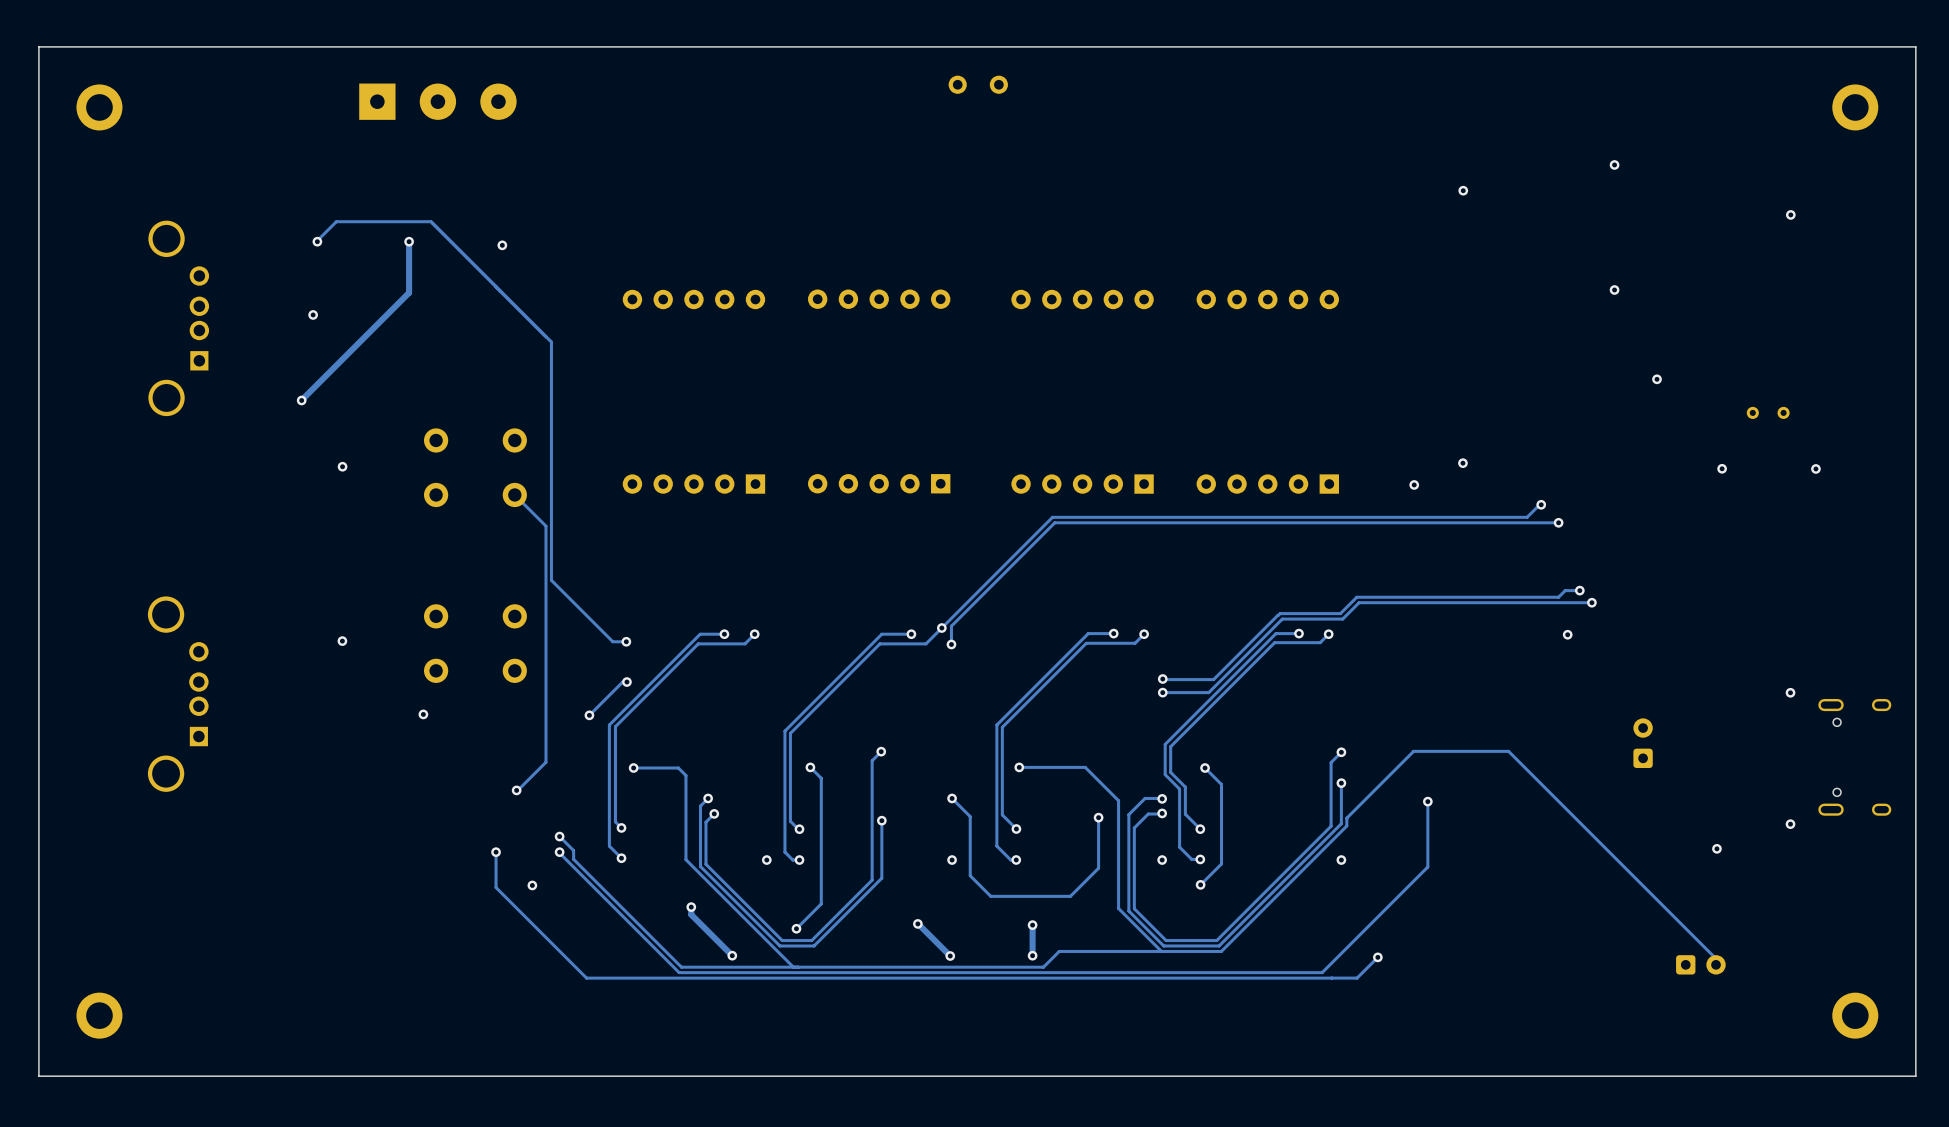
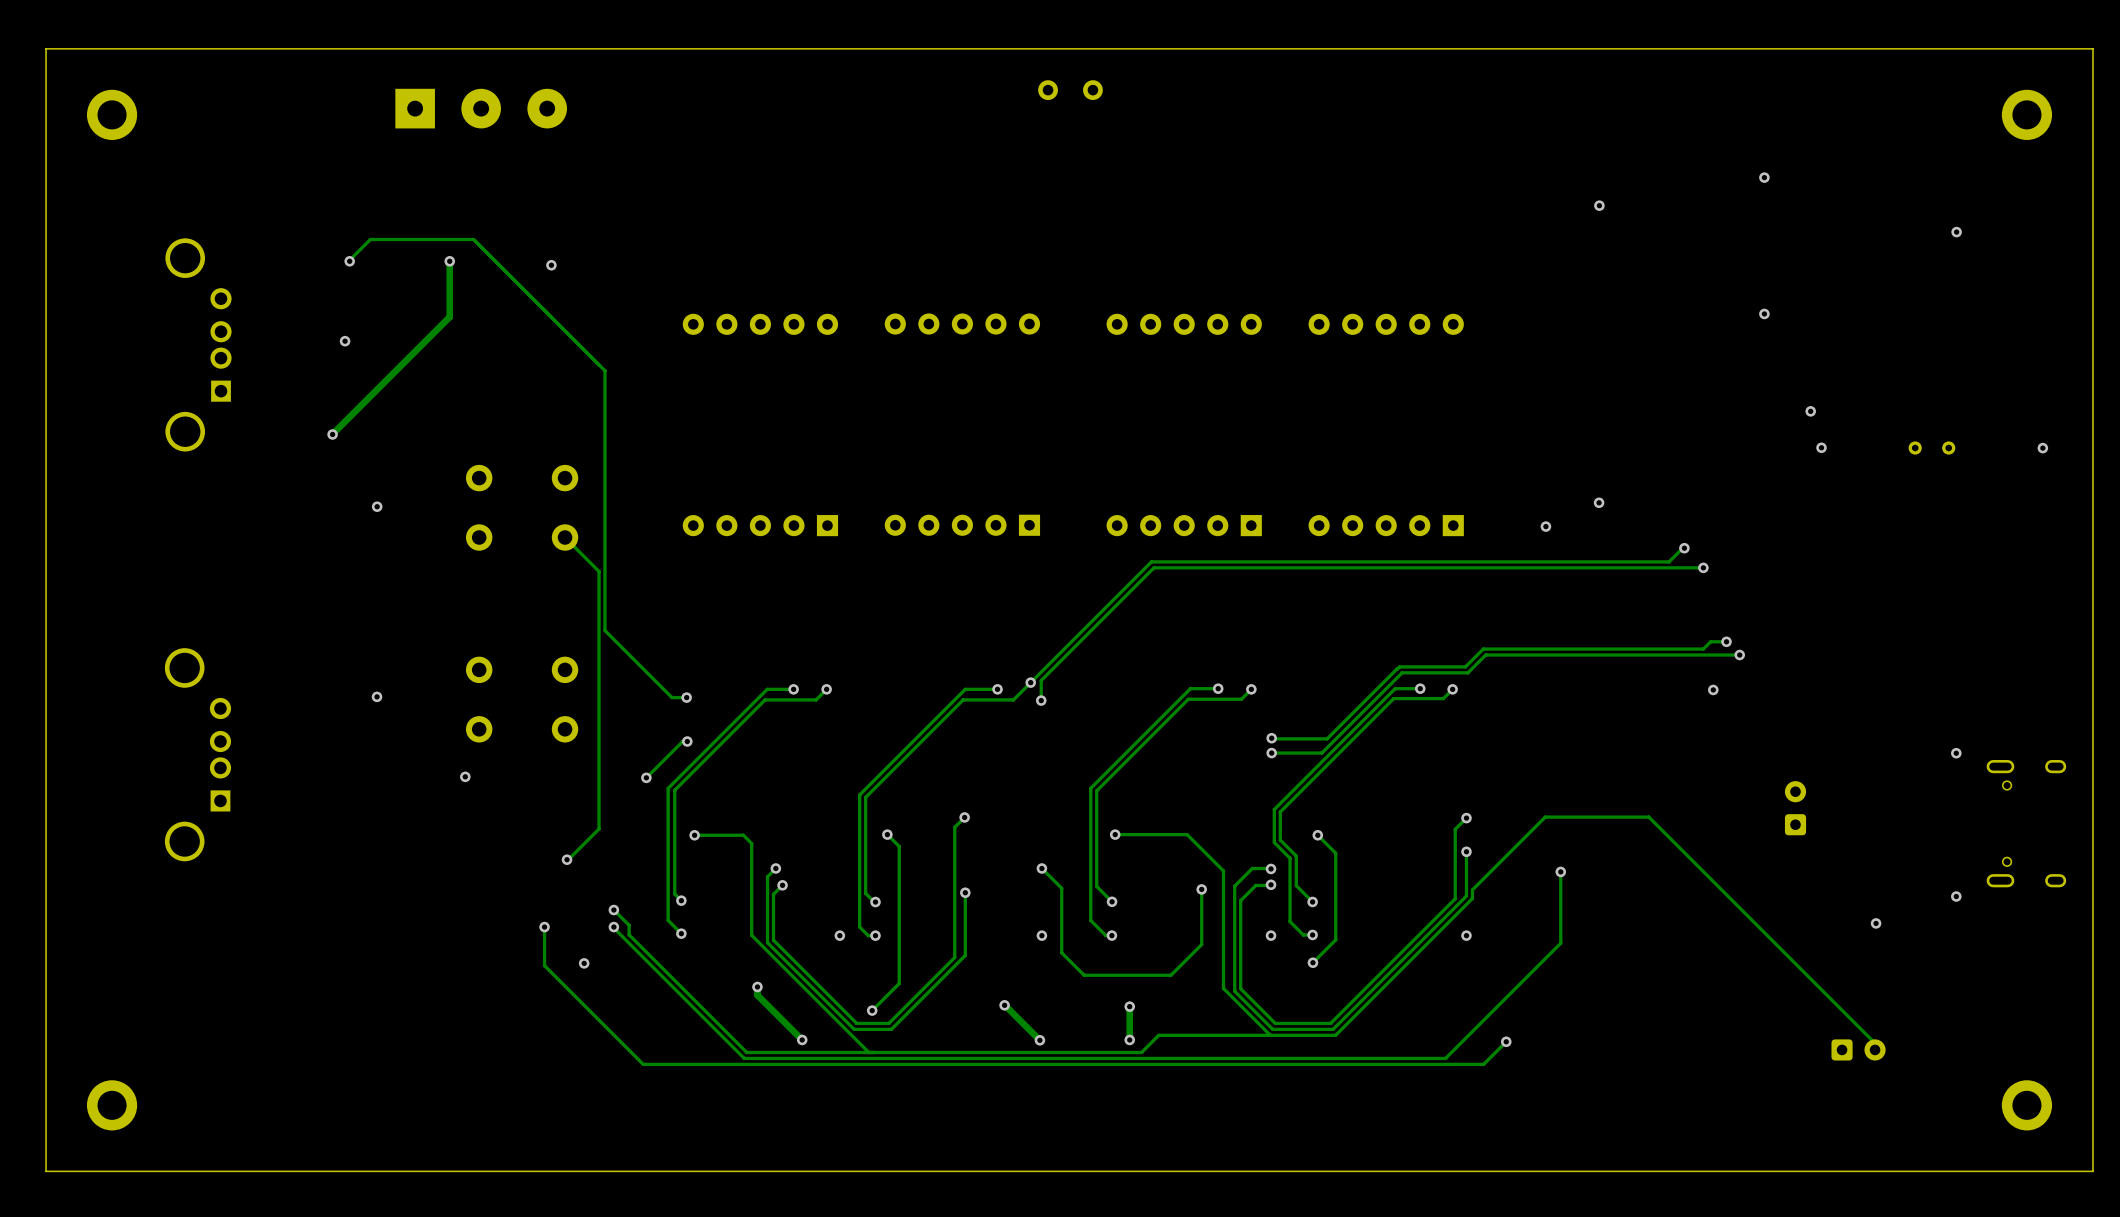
via: none -> (1821, 447)
via: none -> (2042, 448)
via: (1722, 468) -> none
via: (1815, 468) -> none

